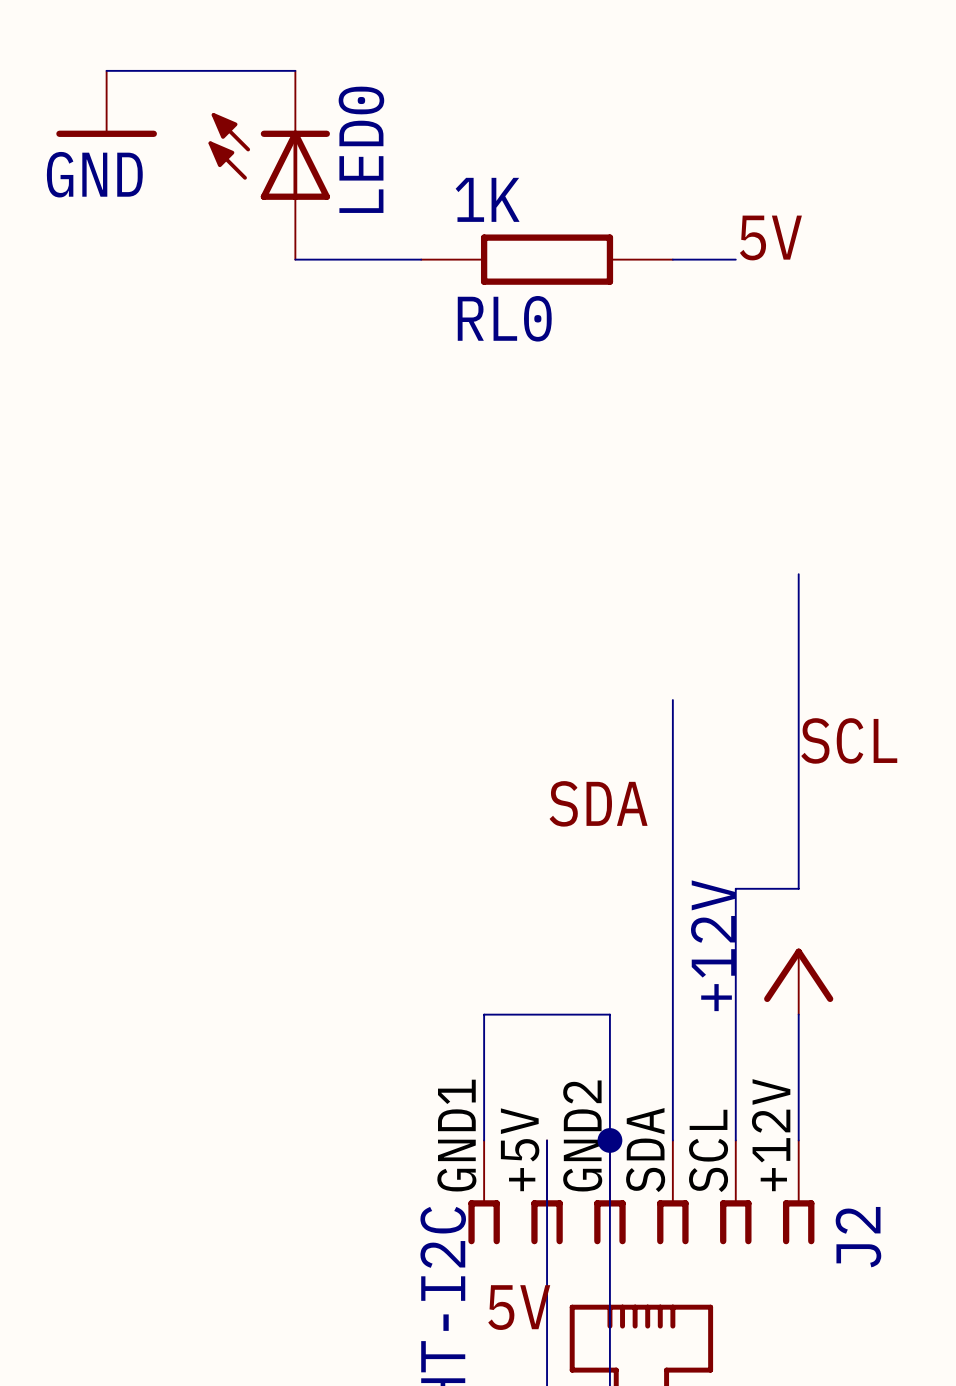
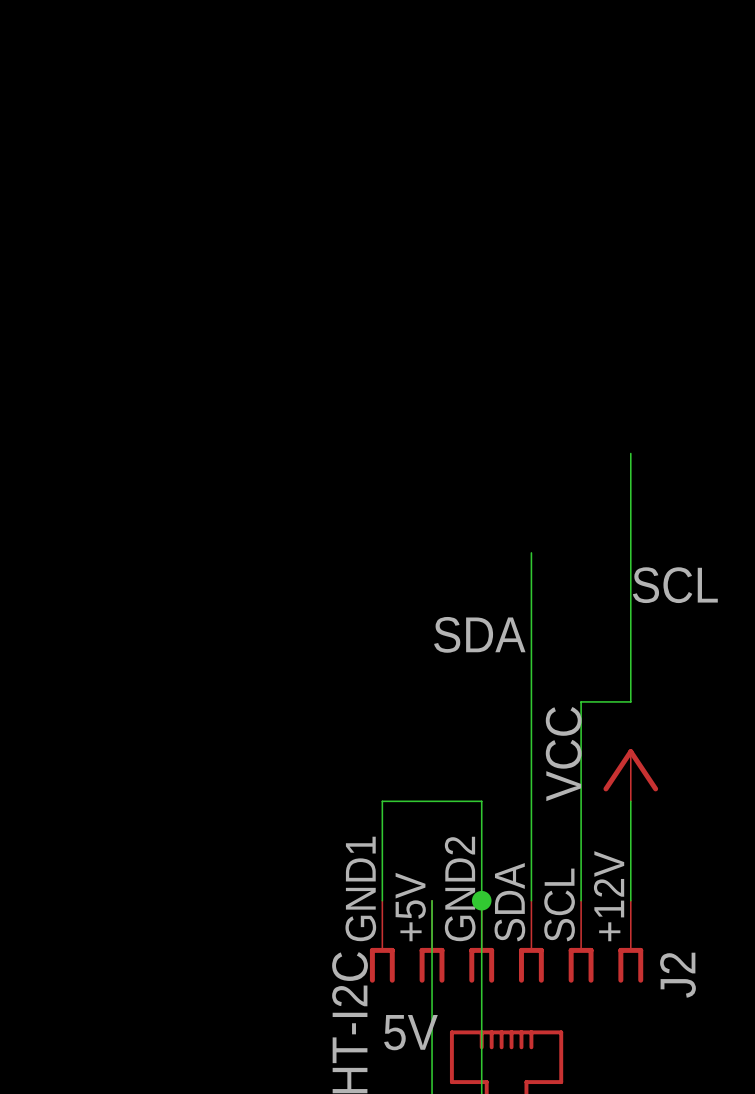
wire: (106, 70) (295, 70) -> none
power symbol: GND (106, 103) -> none
LED0: (269, 165) -> none
label: 5V (770, 237) -> none
wire: (295, 259) (421, 259) -> none
RL0: 1K (547, 259) -> none
wire: (672, 259) (735, 259) -> none
power symbol: +12V (798, 981) -> VCC (630, 775)

